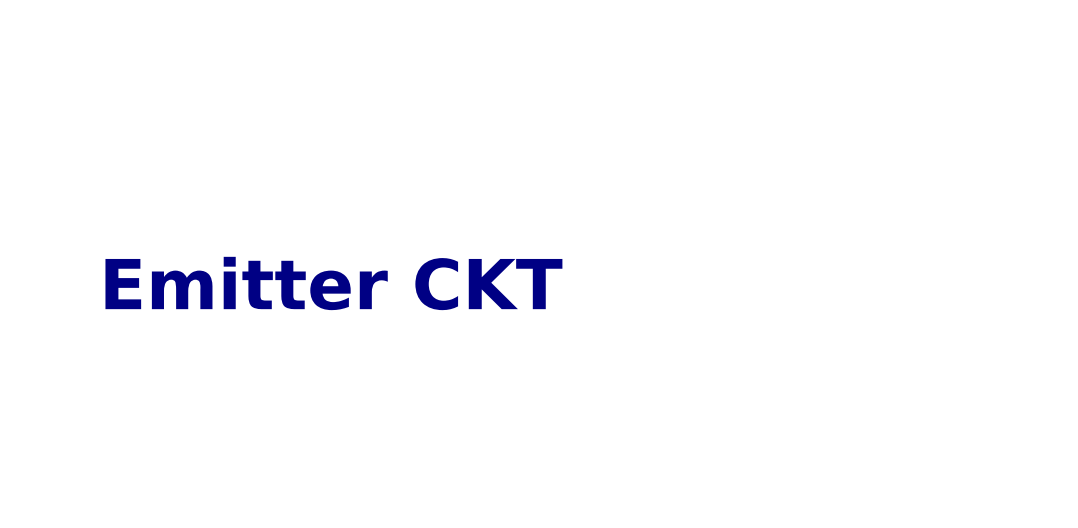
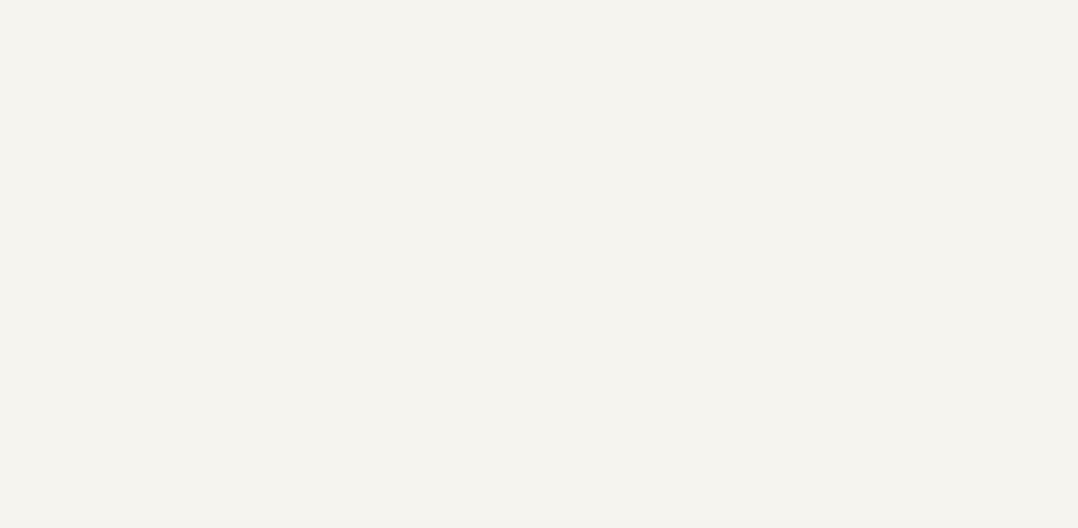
text: Emitter CKT (333, 283) -> none

